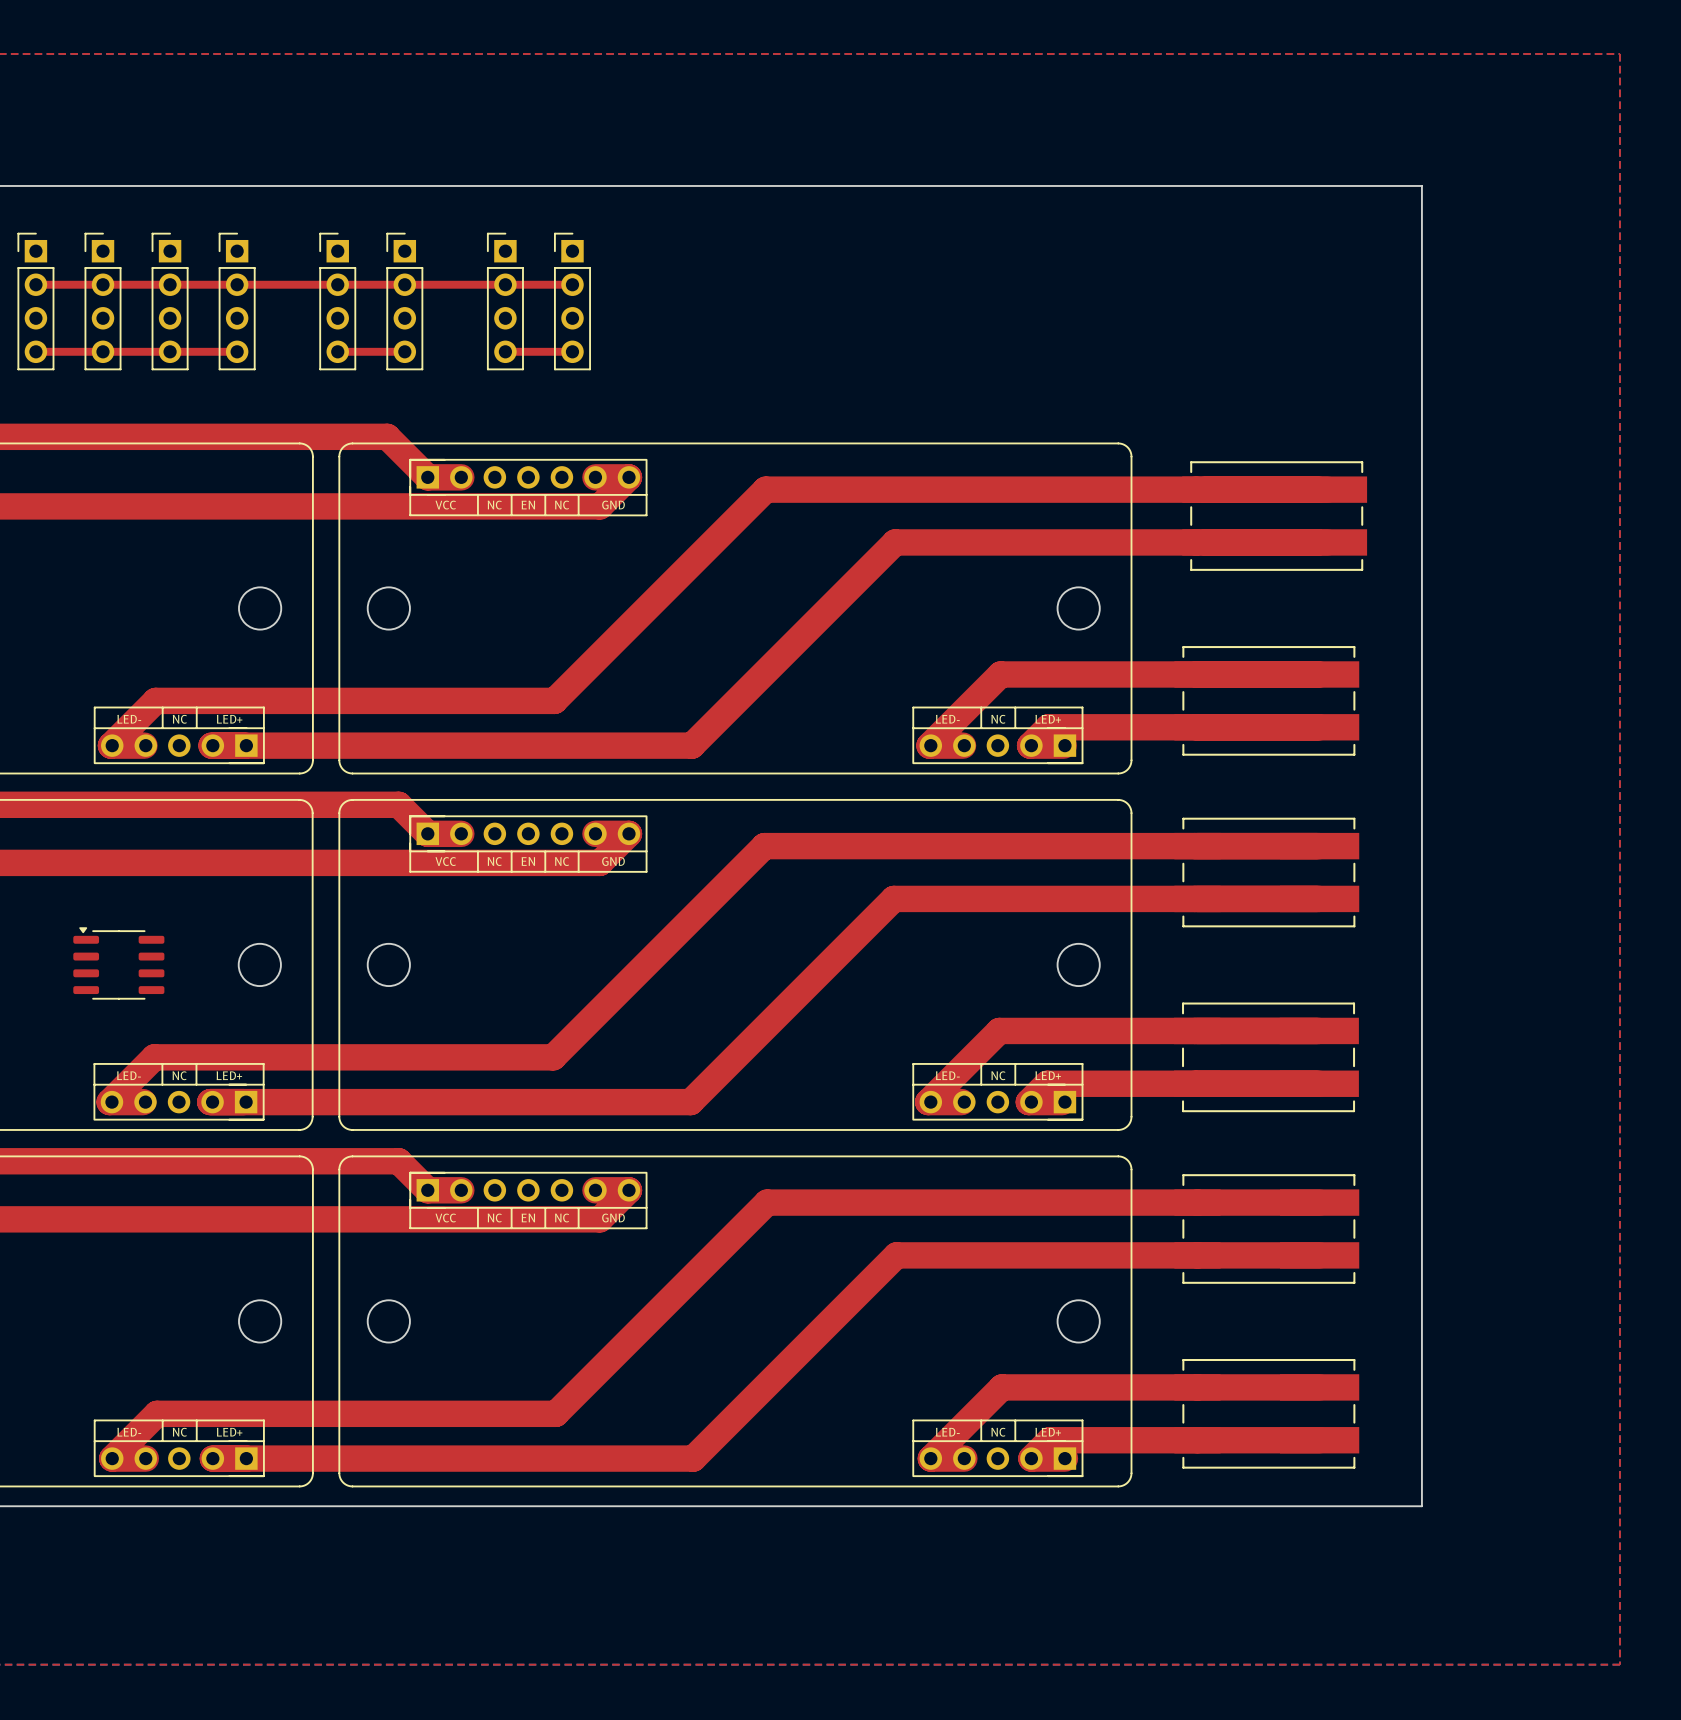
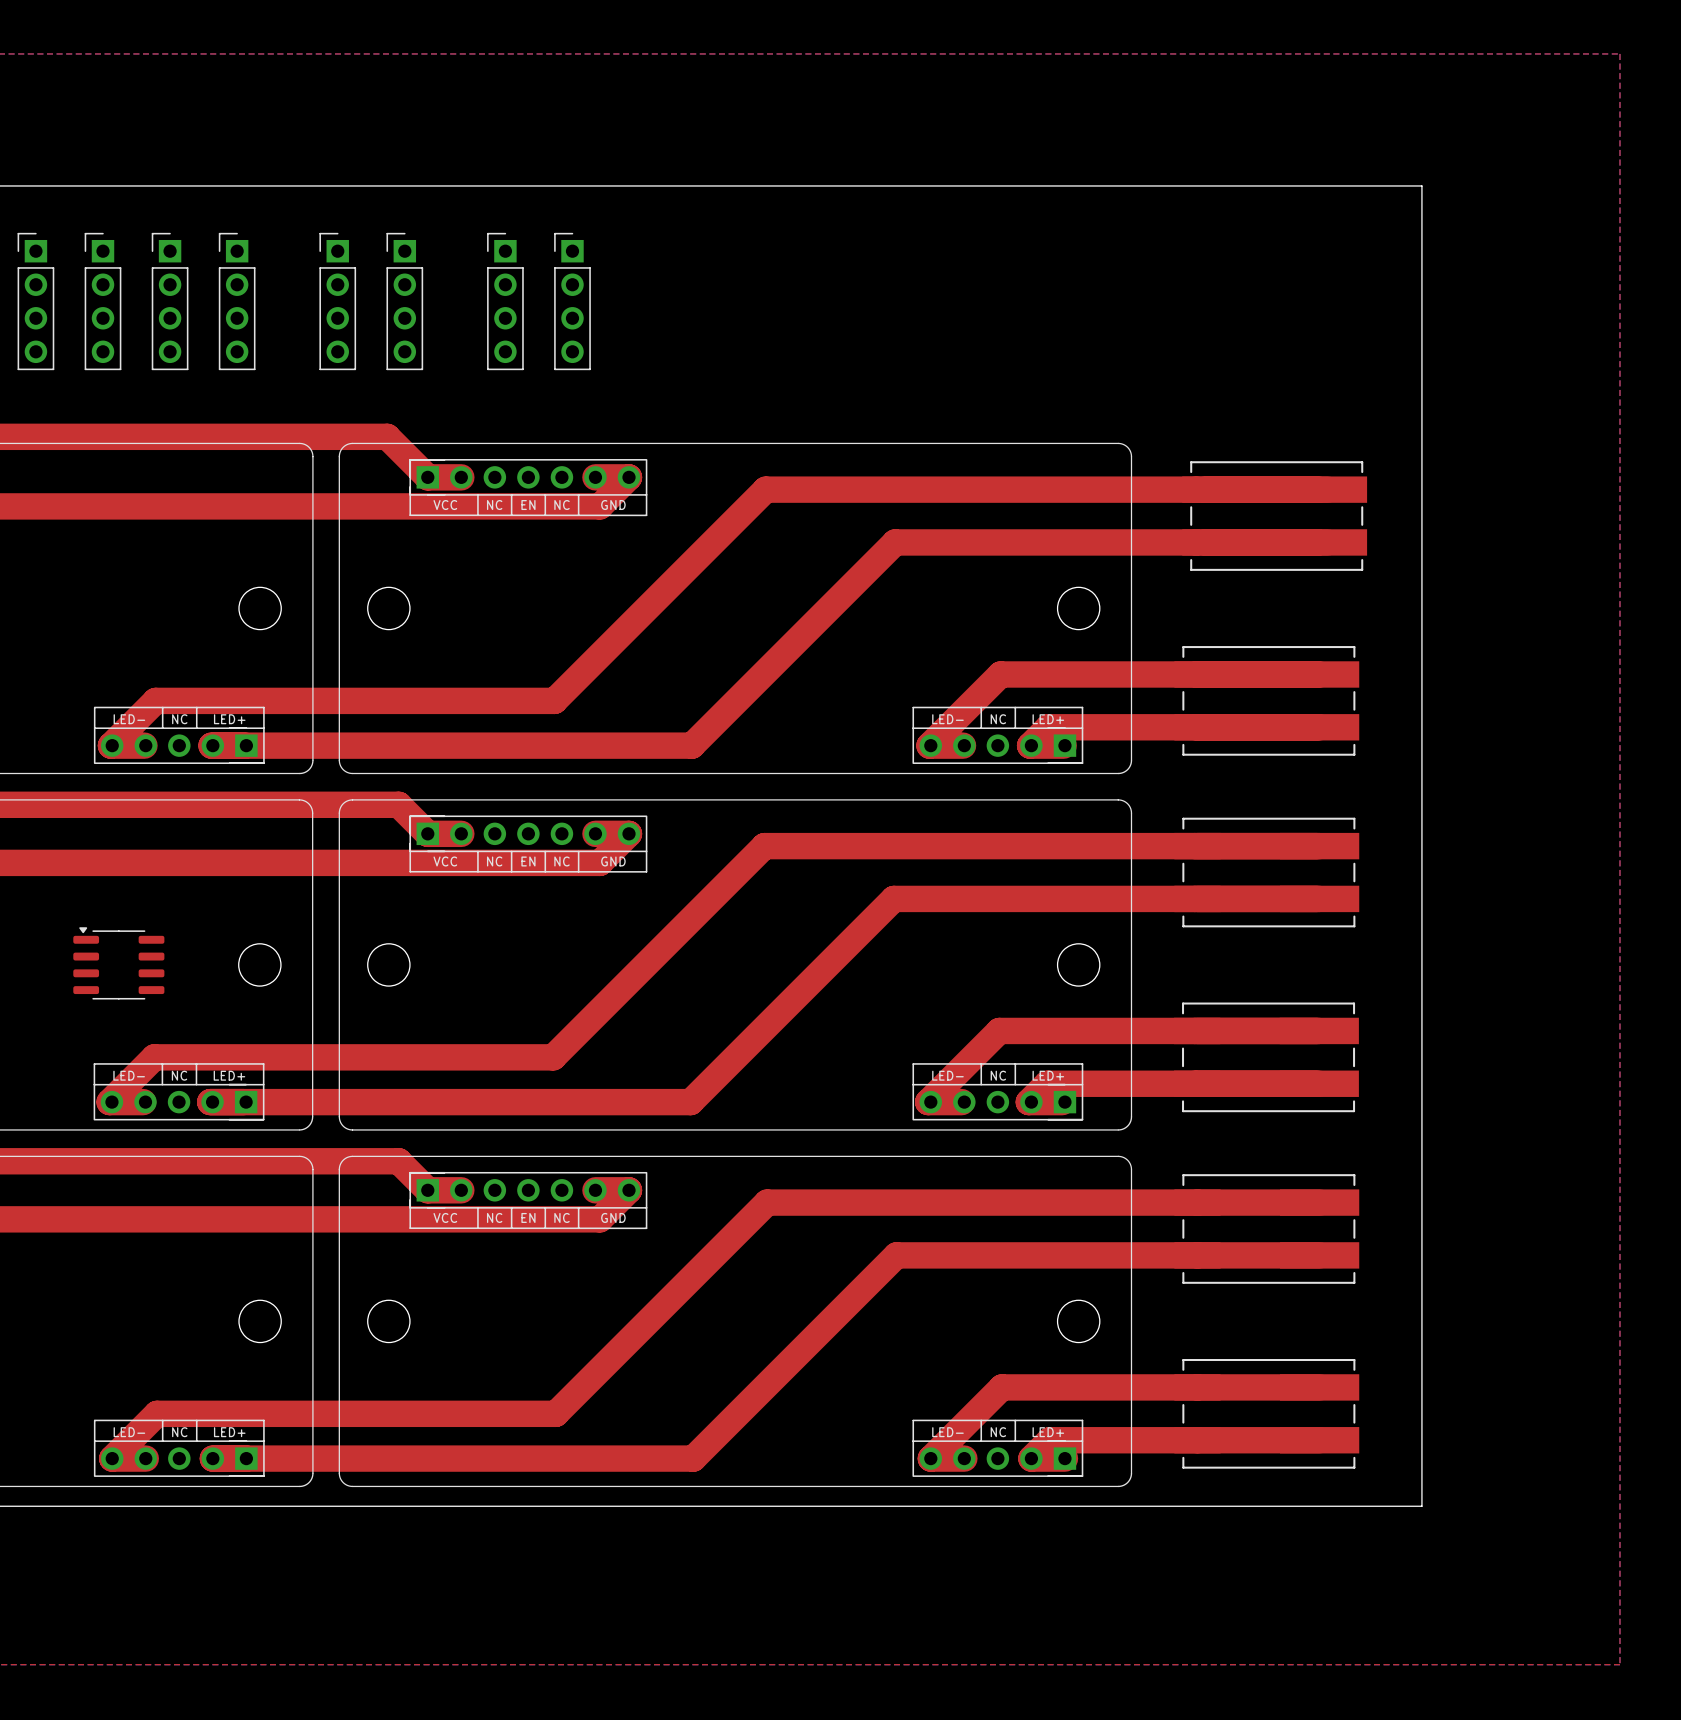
top track: (35, 284) (572, 284) -> none
top track: (35, 351) (237, 351) -> none
top track: (337, 351) (404, 351) -> none
top track: (505, 351) (572, 351) -> none

